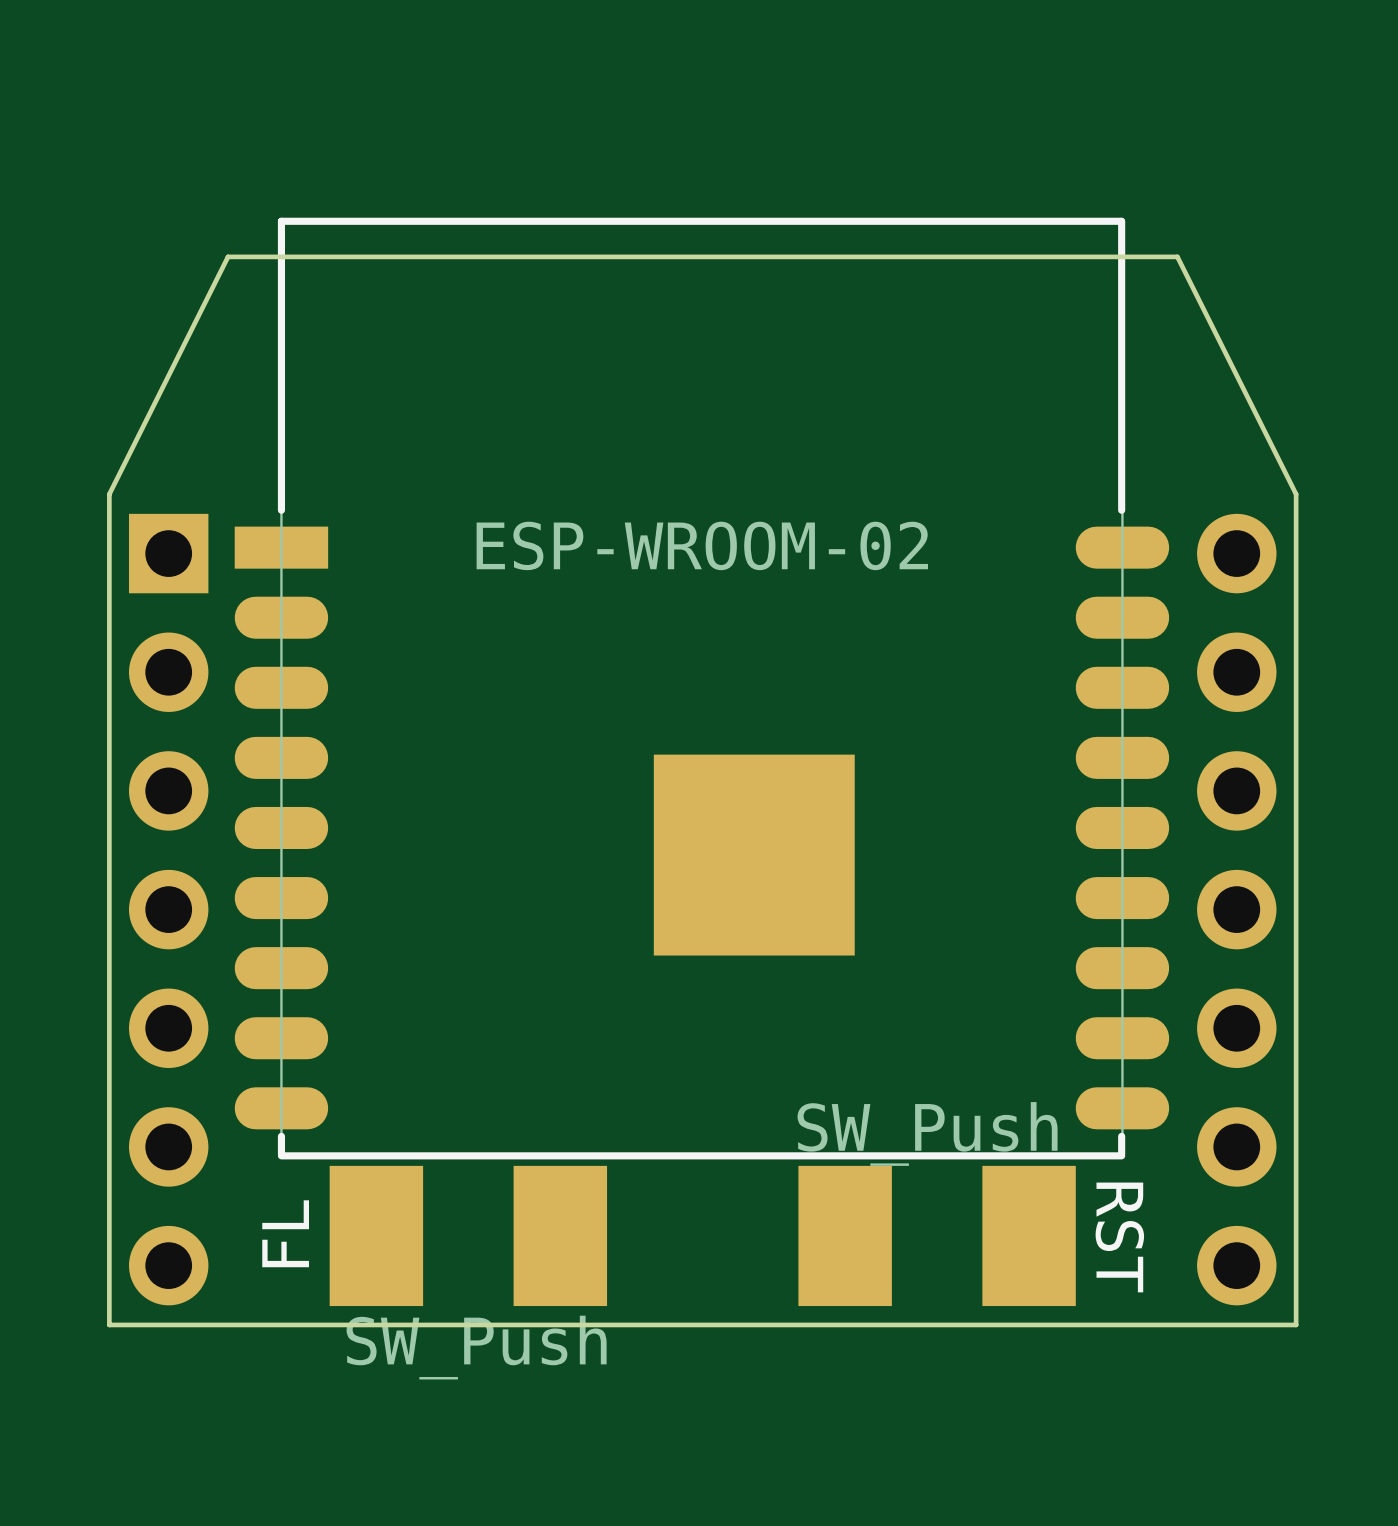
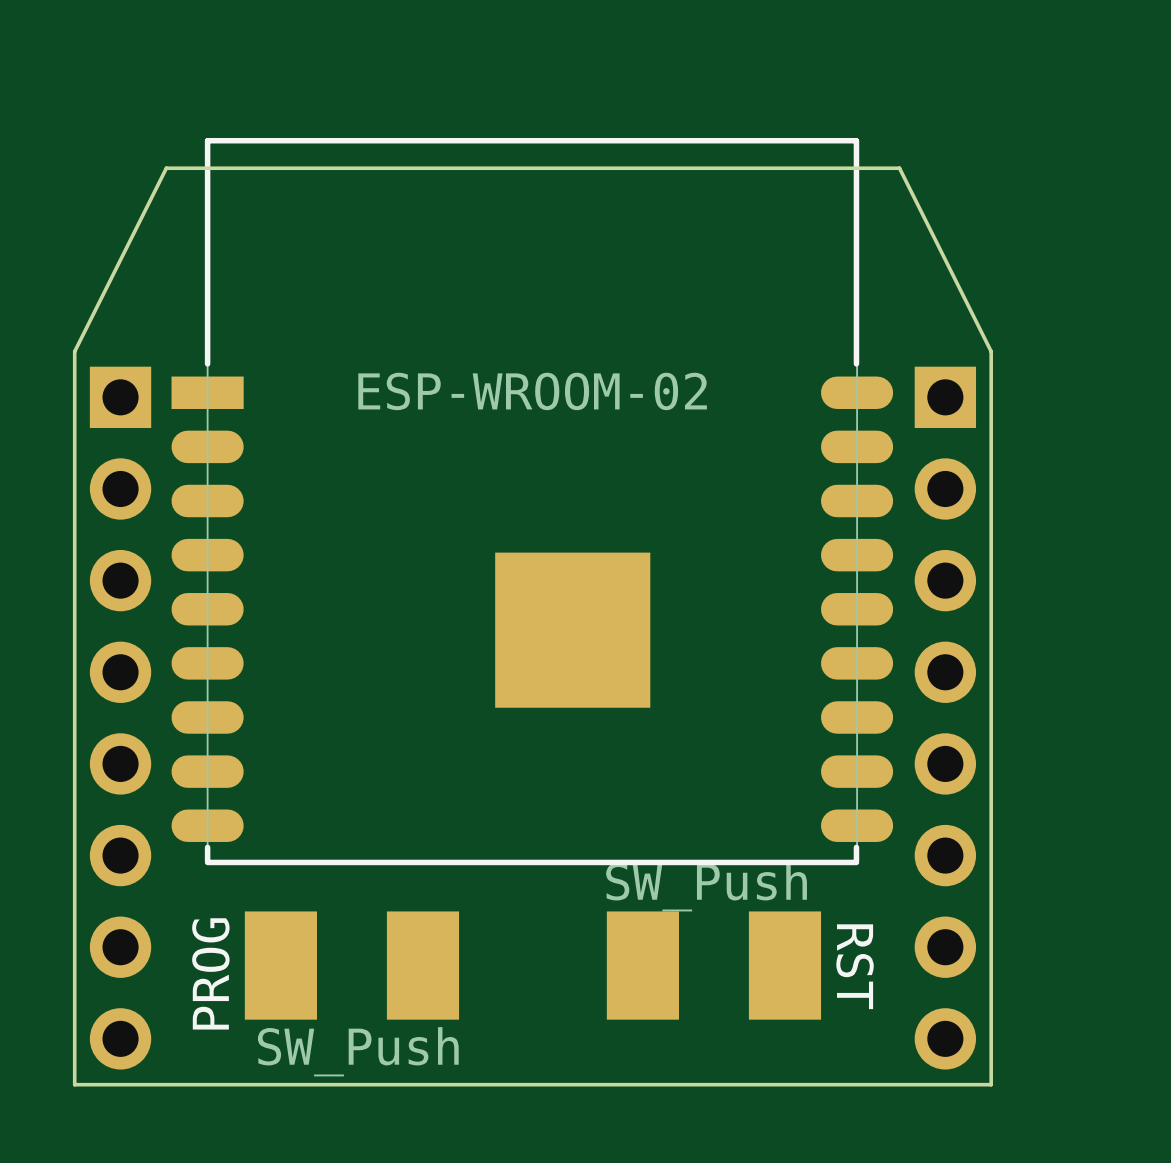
part: (1236, 909) -> none
part: none -> (120, 718)
part: none -> (945, 718)
text: FL (285, 1233) -> none
part position: (468, 1235) -> (351, 965)
part position: (937, 1235) -> (713, 965)
text position: RST (1119, 1237) -> RST (855, 966)
text: none -> PROG (210, 973)
board edge: (109, 1324) (1296, 1324) -> (74, 993) (74, 1084) (991, 1084) (991, 993)

